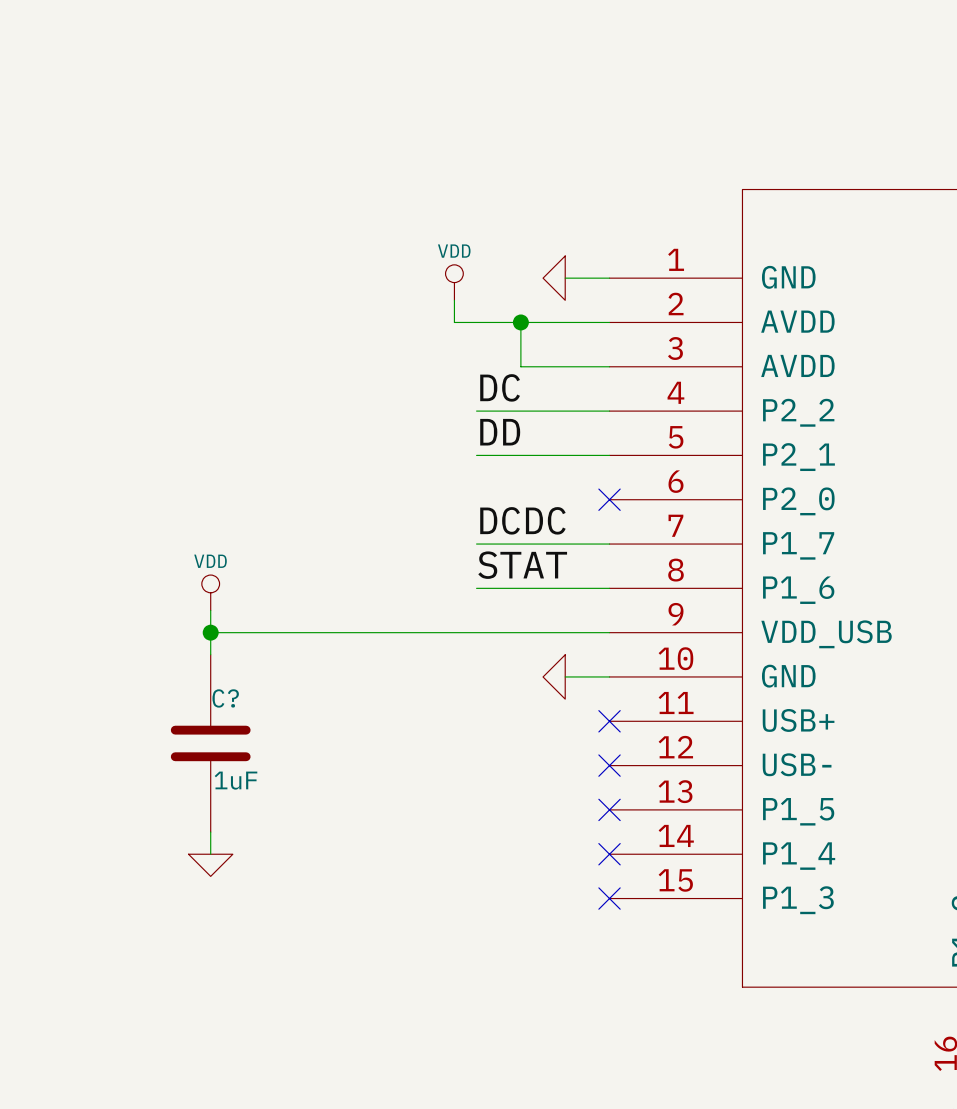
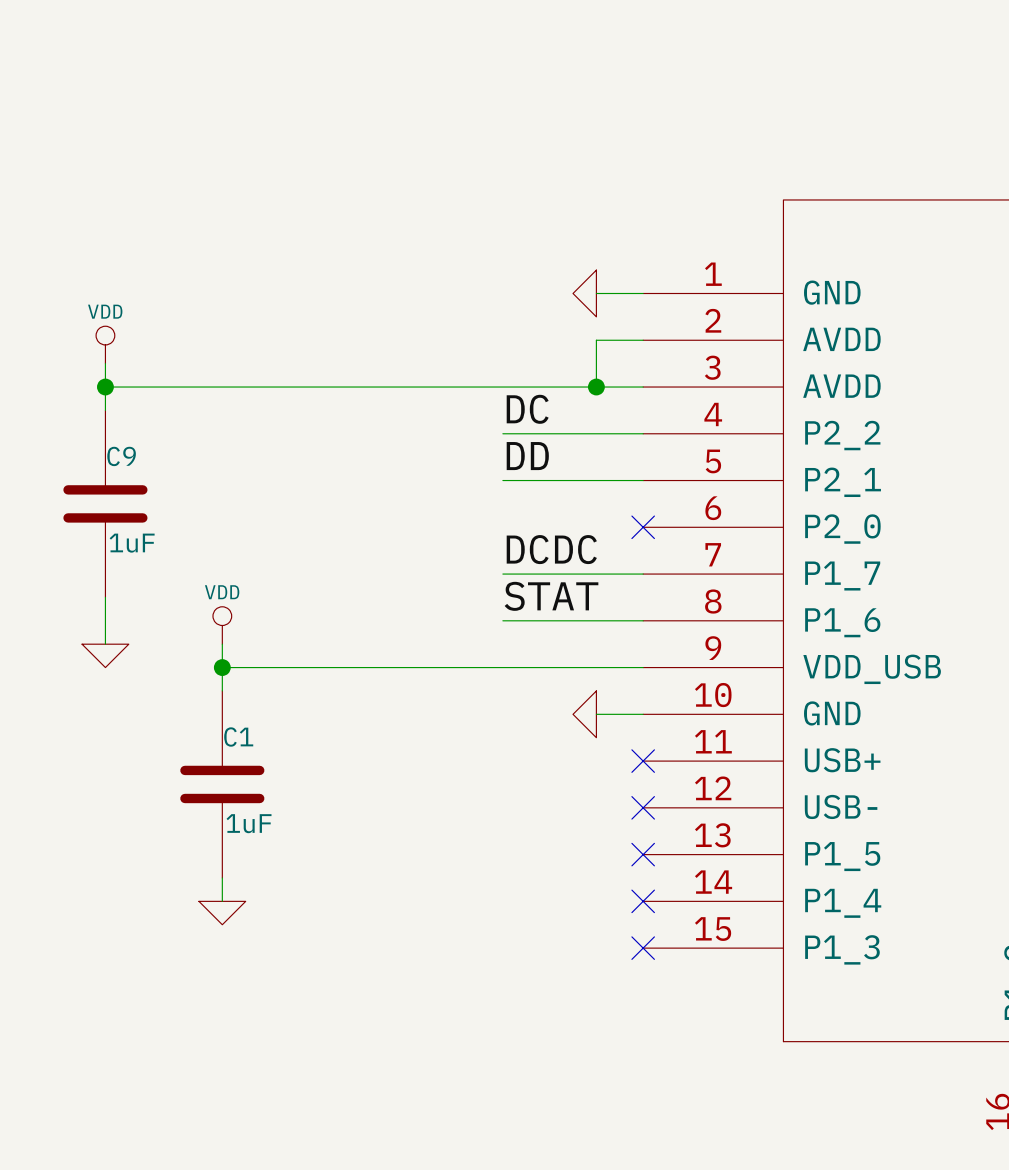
power symbol position: VDD (454, 282) -> VDD (105, 344)
wire: (454, 300) (454, 322) (565, 322) -> (596, 387) (596, 340)
wire: (520, 322) (520, 366) -> (105, 387) (549, 387)
junction position: (520, 322) -> (596, 387)
wire: none -> (105, 363) (105, 410)
junction: none -> (105, 387)
C9: none -> 1uF (105, 503)
wire: none -> (105, 597) (105, 644)
power symbol: none -> (105, 655)
C? name: C? (225, 698) -> C1 (238, 737)

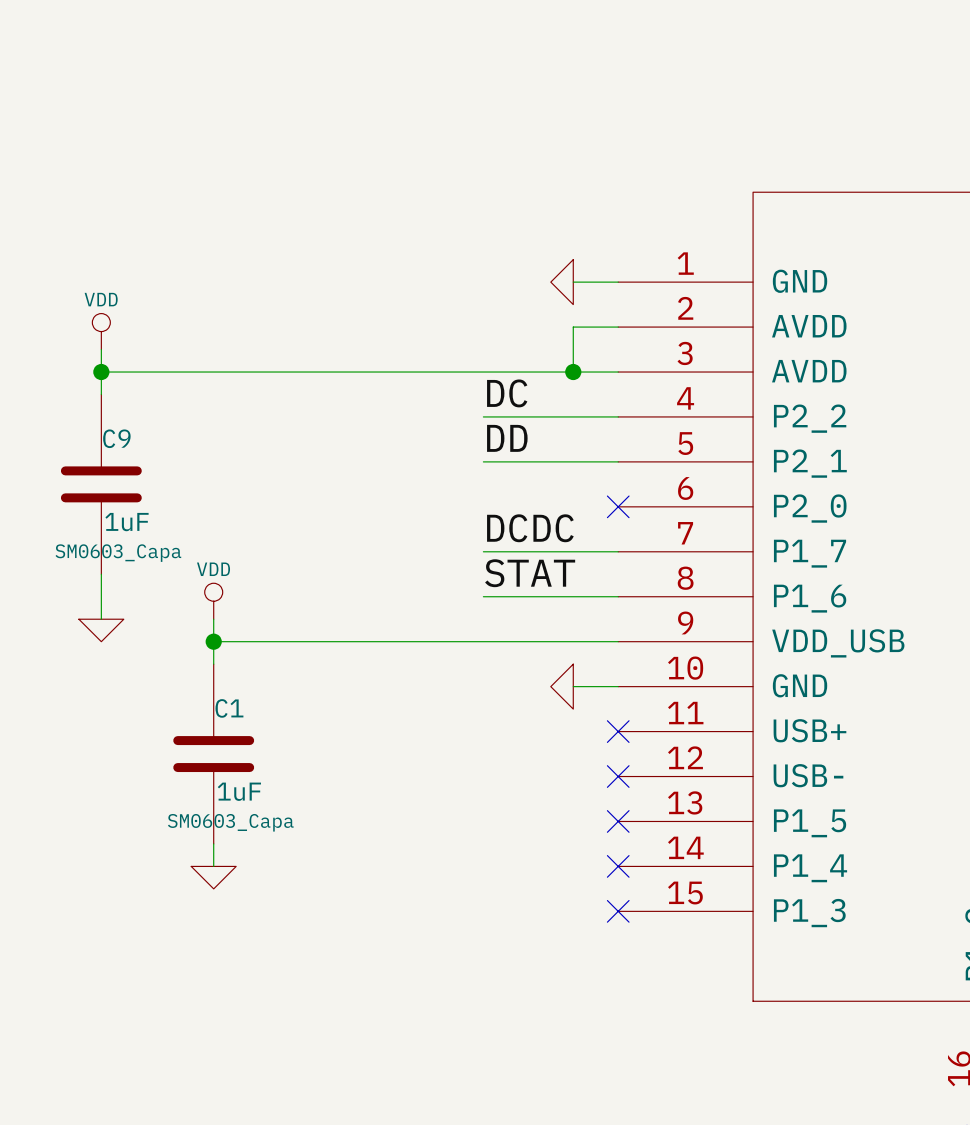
C9 text: none -> SM0603_Capa (118, 553)
C1 text: none -> SM0603_Capa (230, 822)

